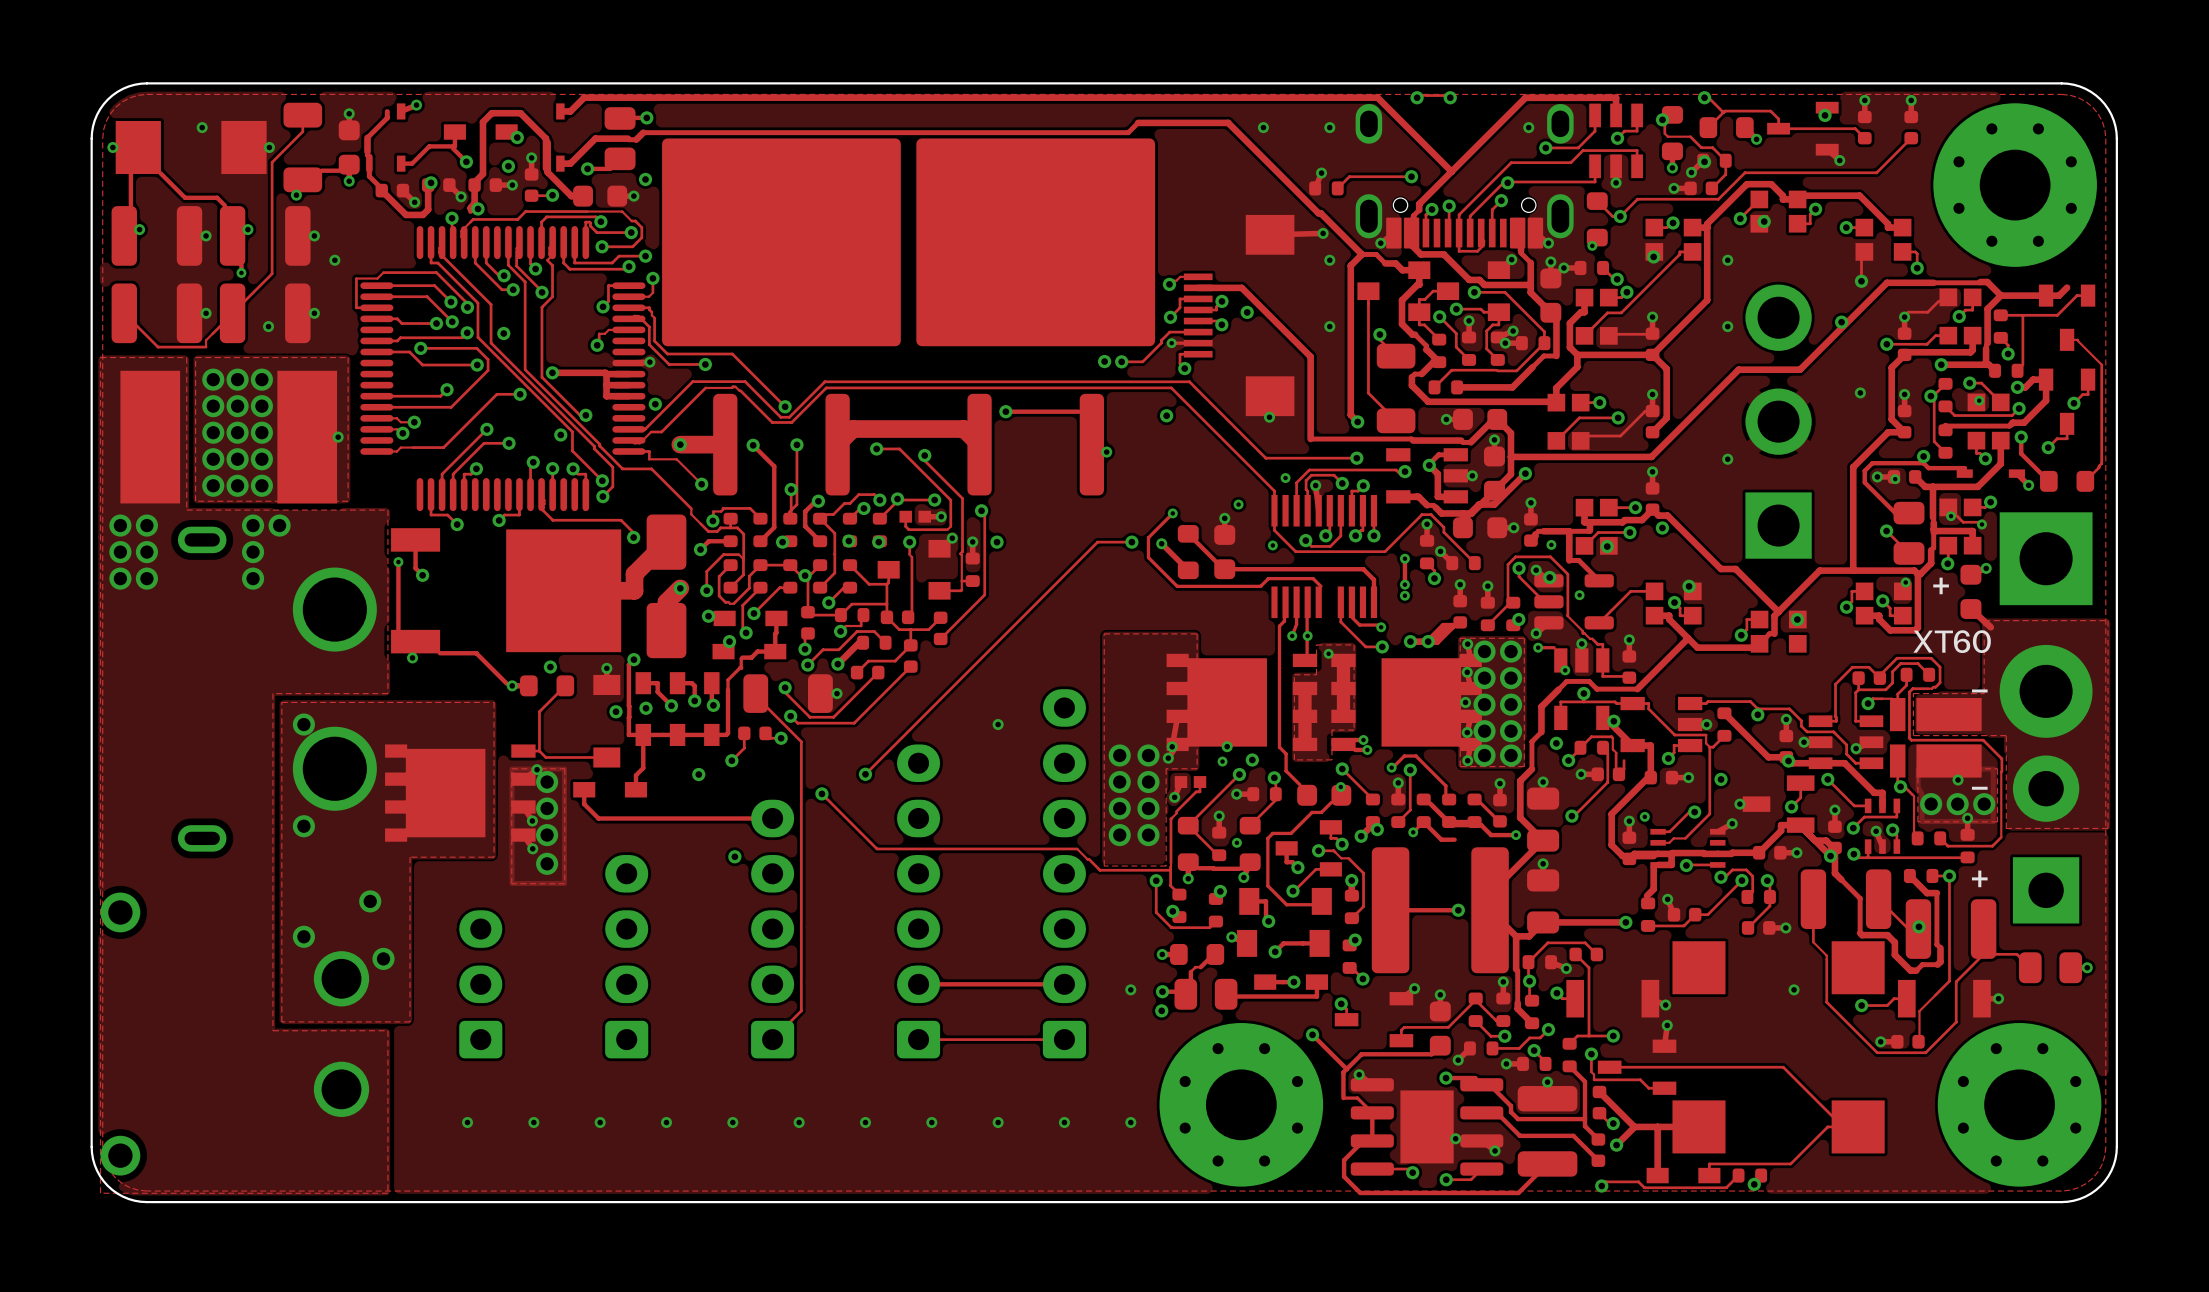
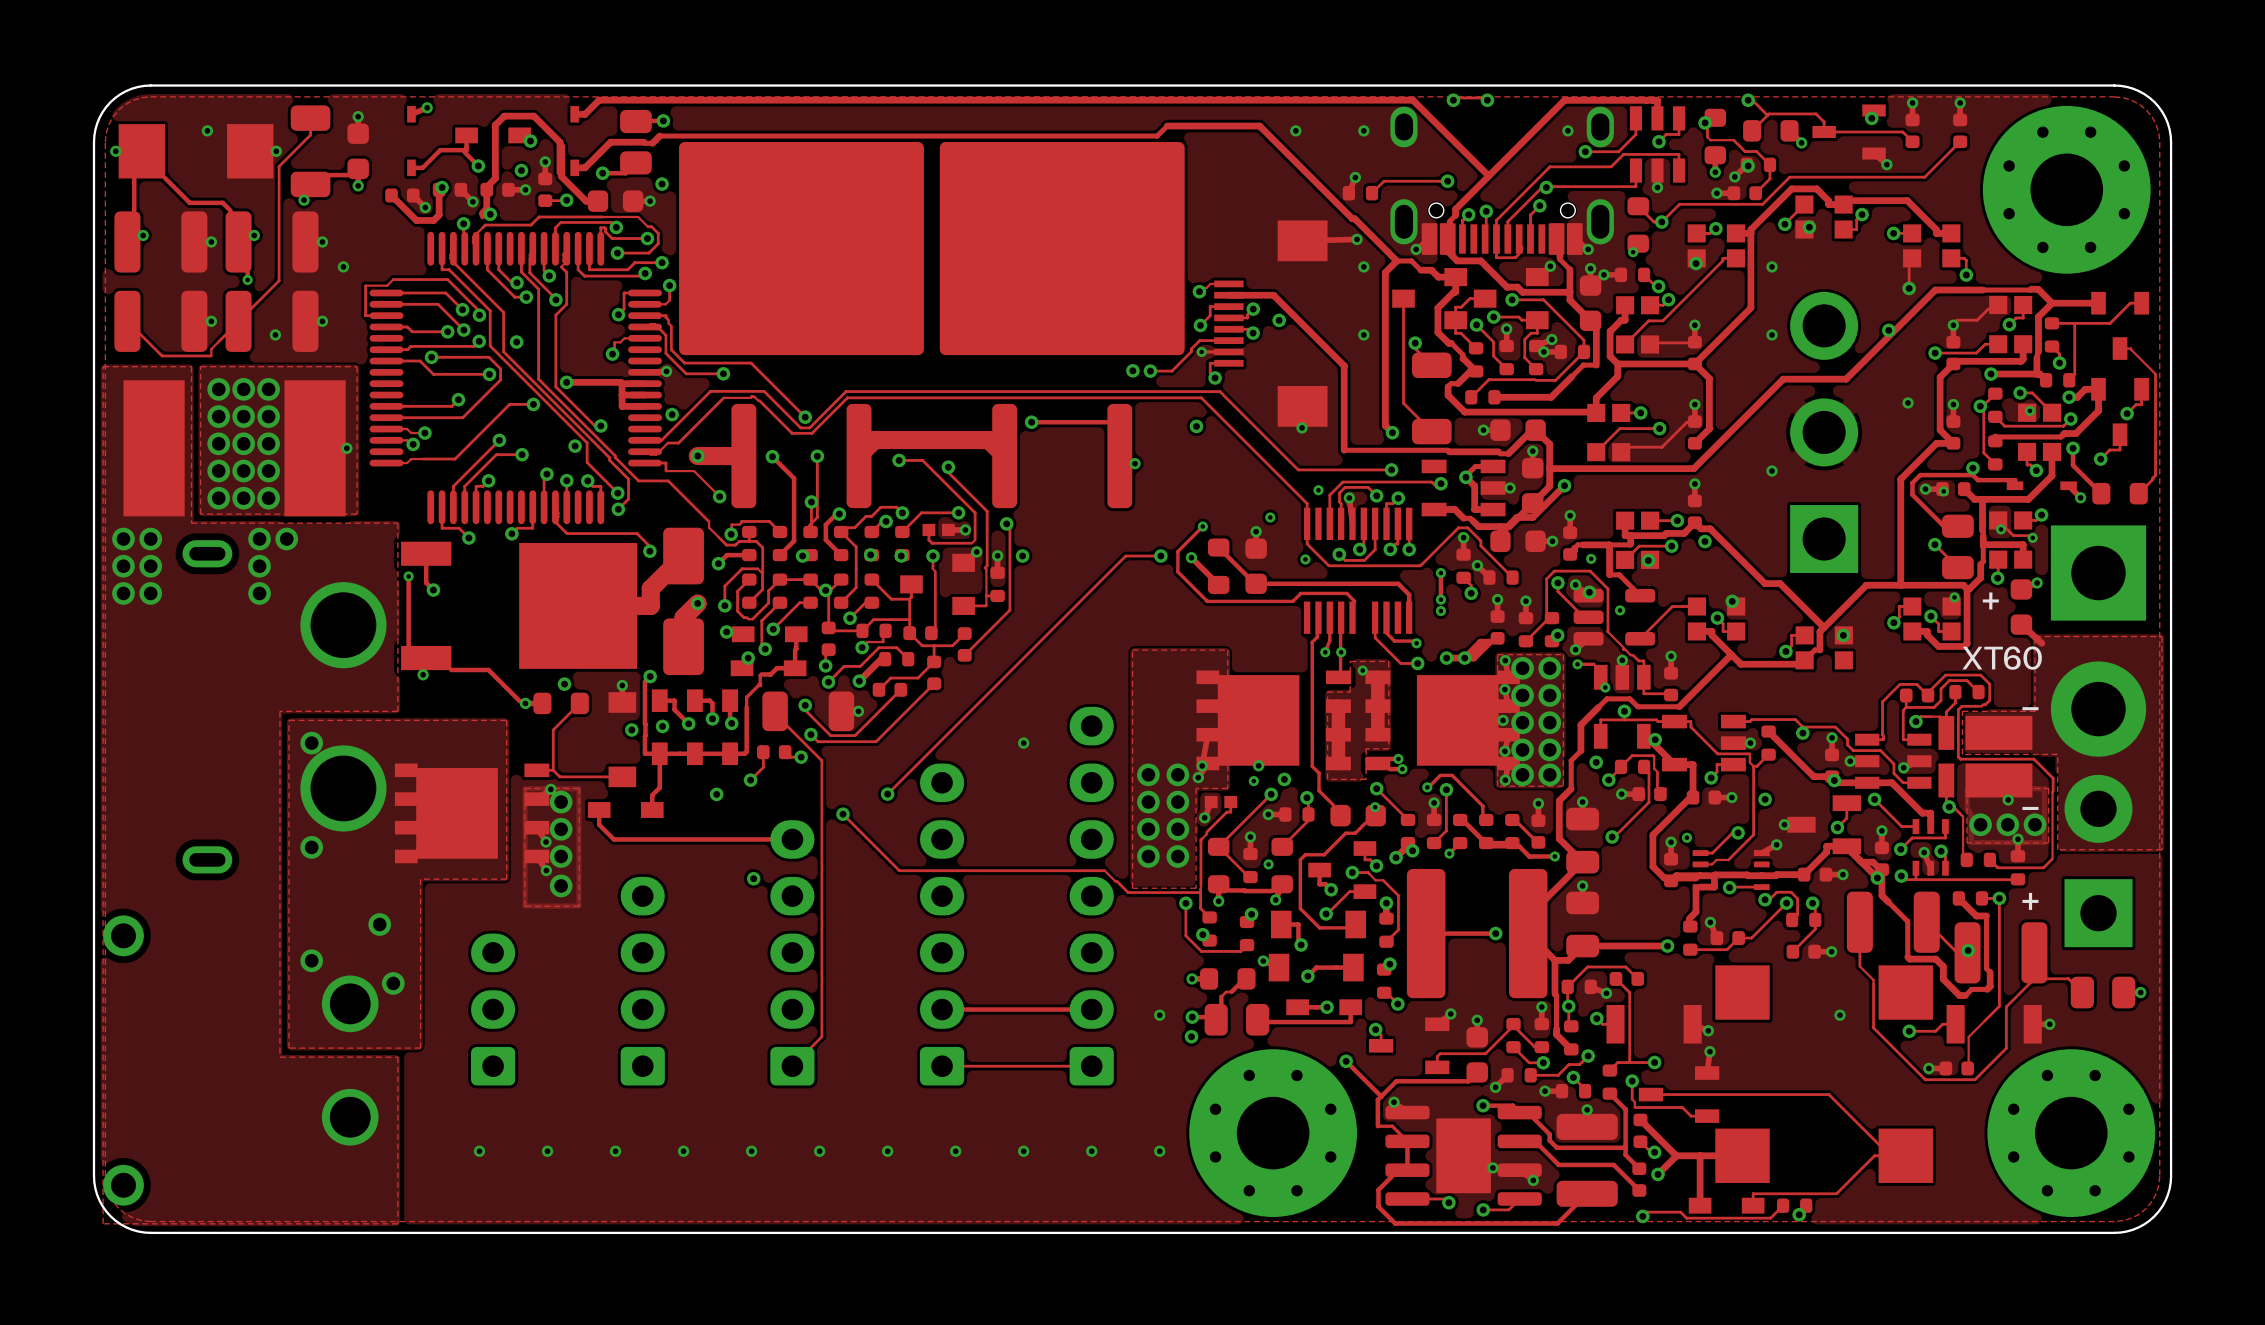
track: (387, 111) (387, 117) (367, 137) (369, 176) (381, 188) -> none
track: (2067, 287) (2059, 295) (2046, 295) -> none
via: (897, 499) -> none
track: (1624, 760) (1624, 769) -> none
track: (1423, 822) (1441, 839) (1454, 839) -> none

